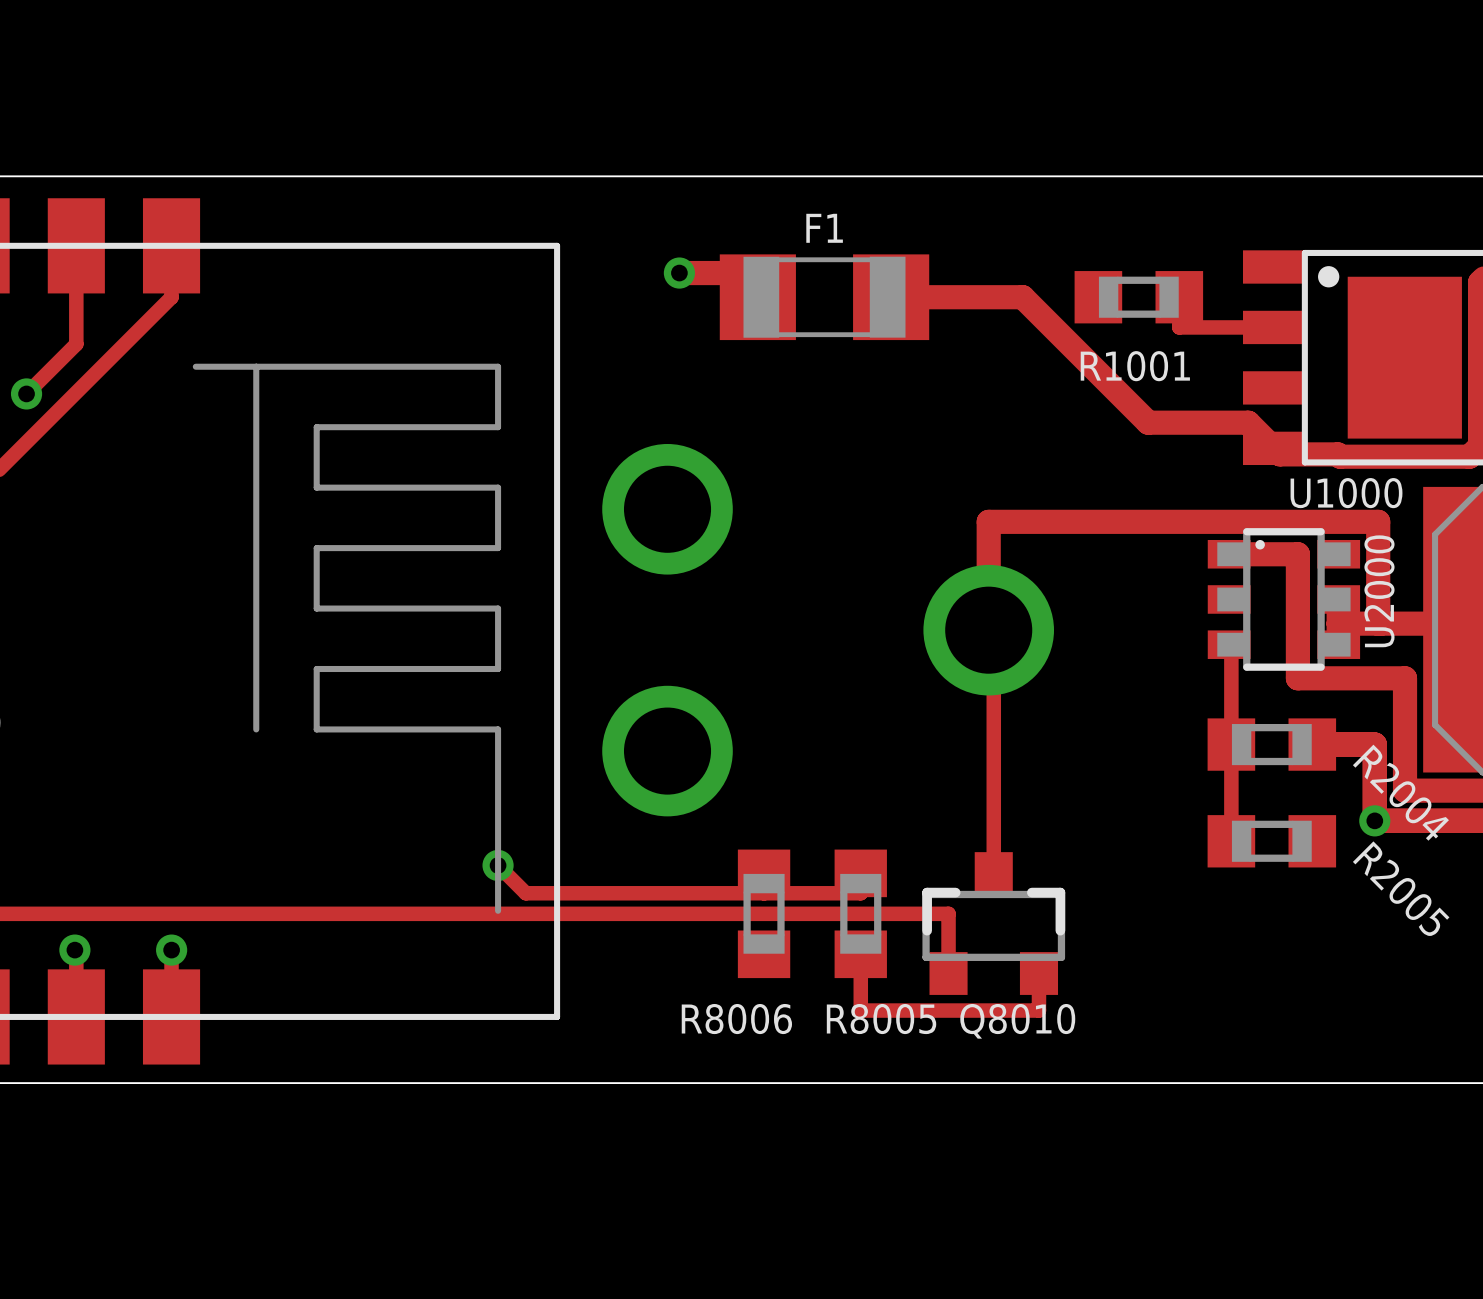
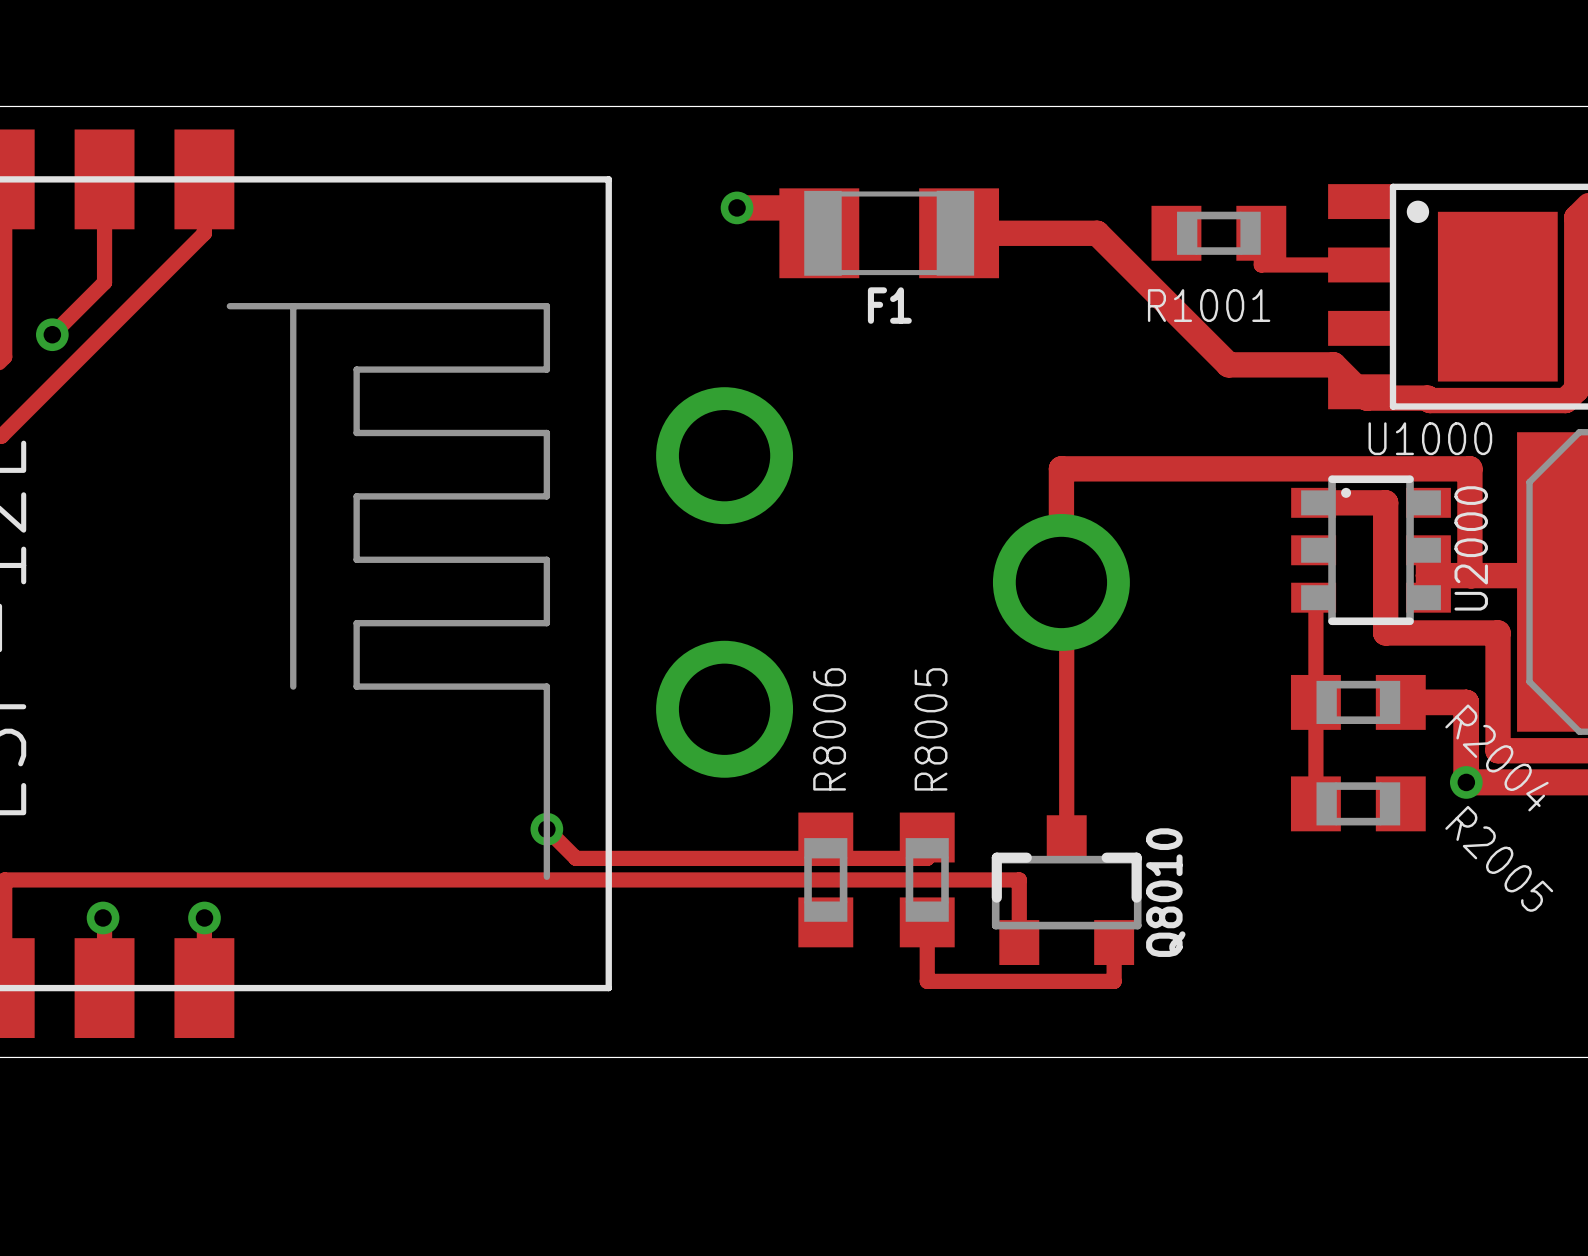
F1 name position: F1 (824, 228) -> F1 (889, 305)
R8006 name rotation: 0° (736, 1019) -> 90° counterclockwise (829, 729)
R8006 name position: R8006 (736, 1019) -> R8006 (829, 729)
R8005 name rotation: 0° (881, 1019) -> 90° counterclockwise (931, 729)
R8005 name position: R8005 (881, 1019) -> R8005 (931, 729)
Q8010 name rotation: 0° (1017, 1021) -> 90° counterclockwise (1165, 892)

